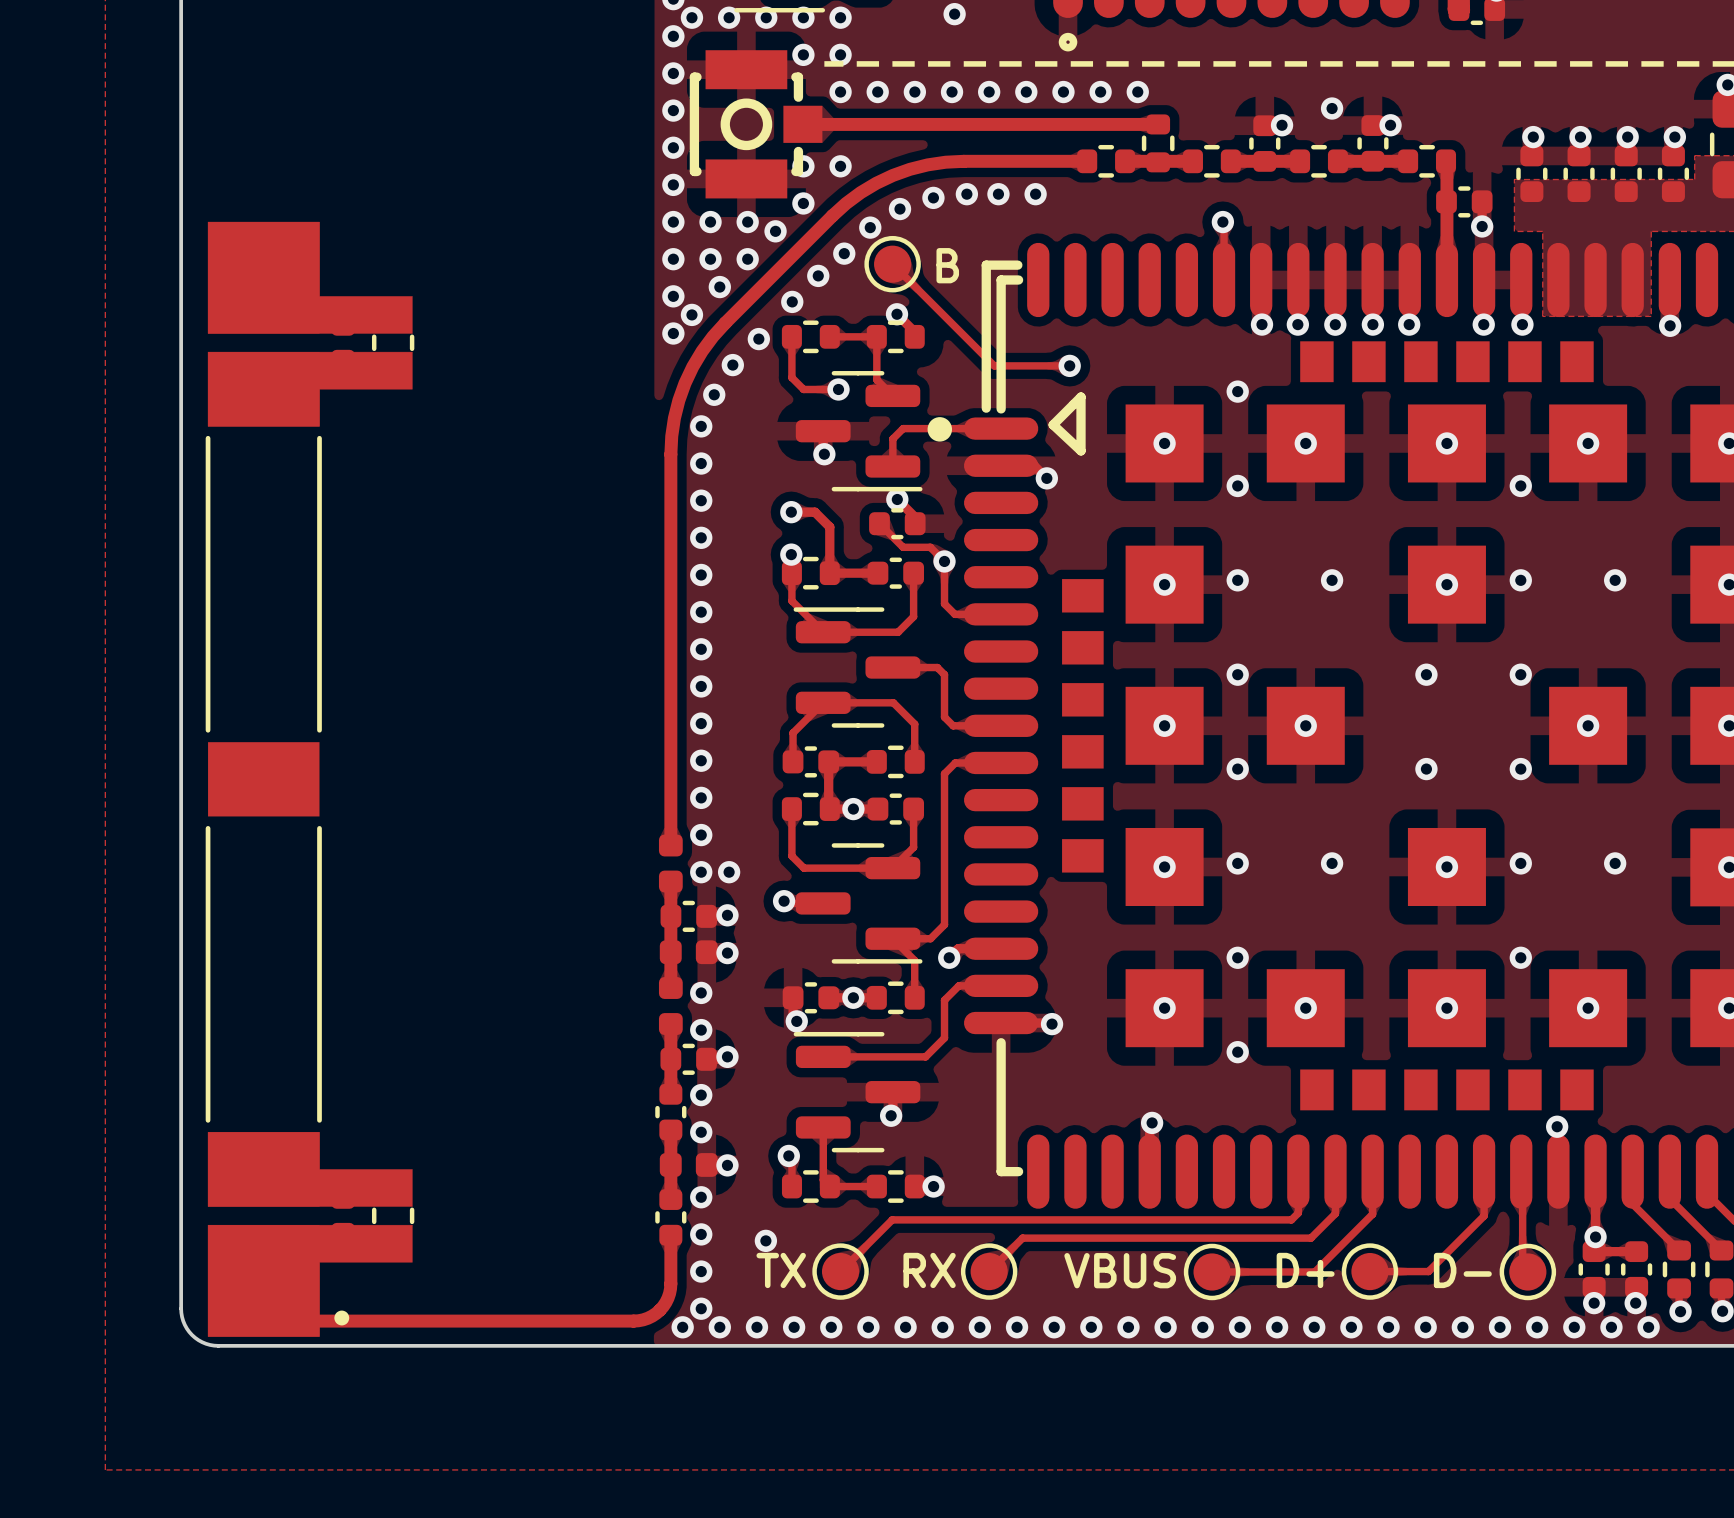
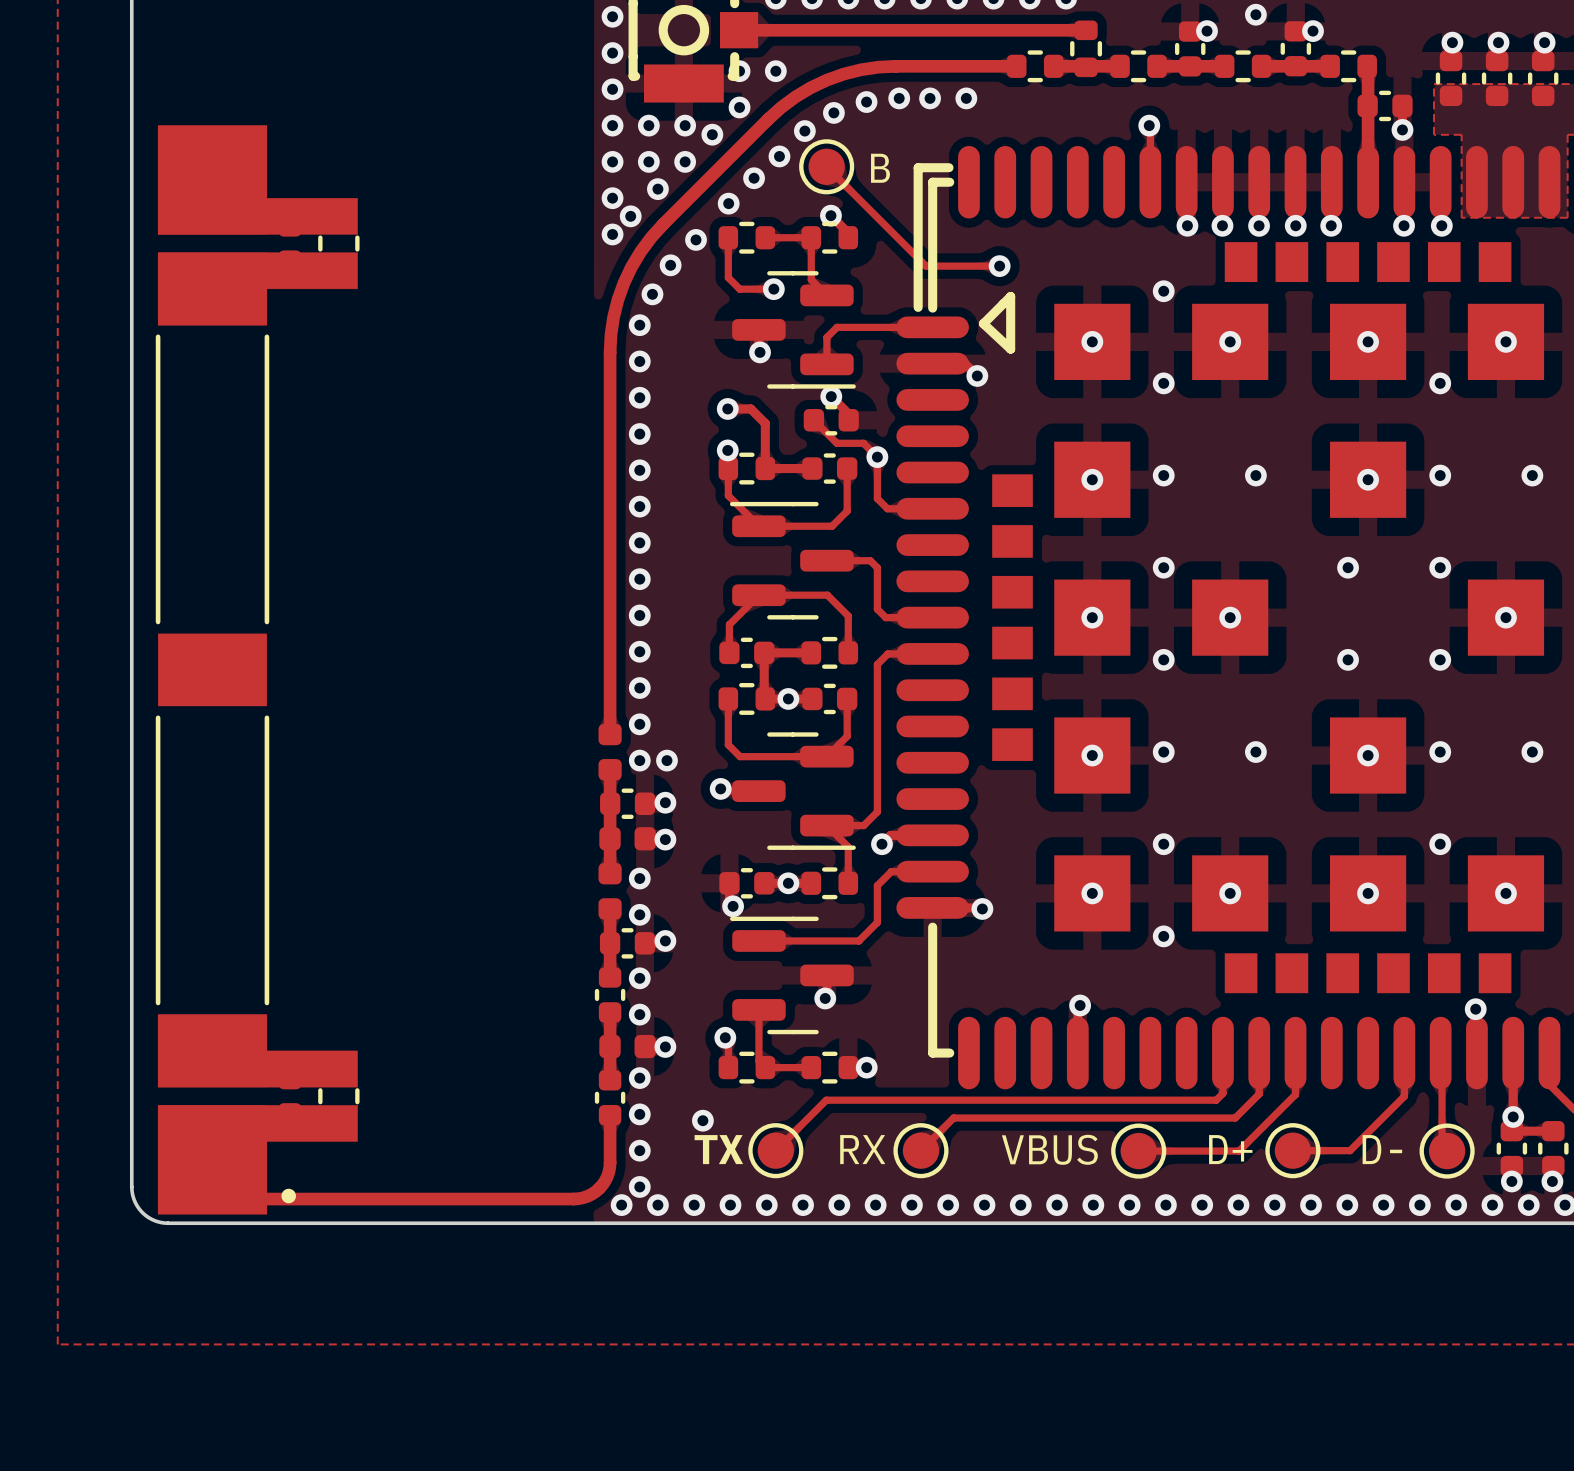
drawing: [927, 417, 953, 442] -> none

